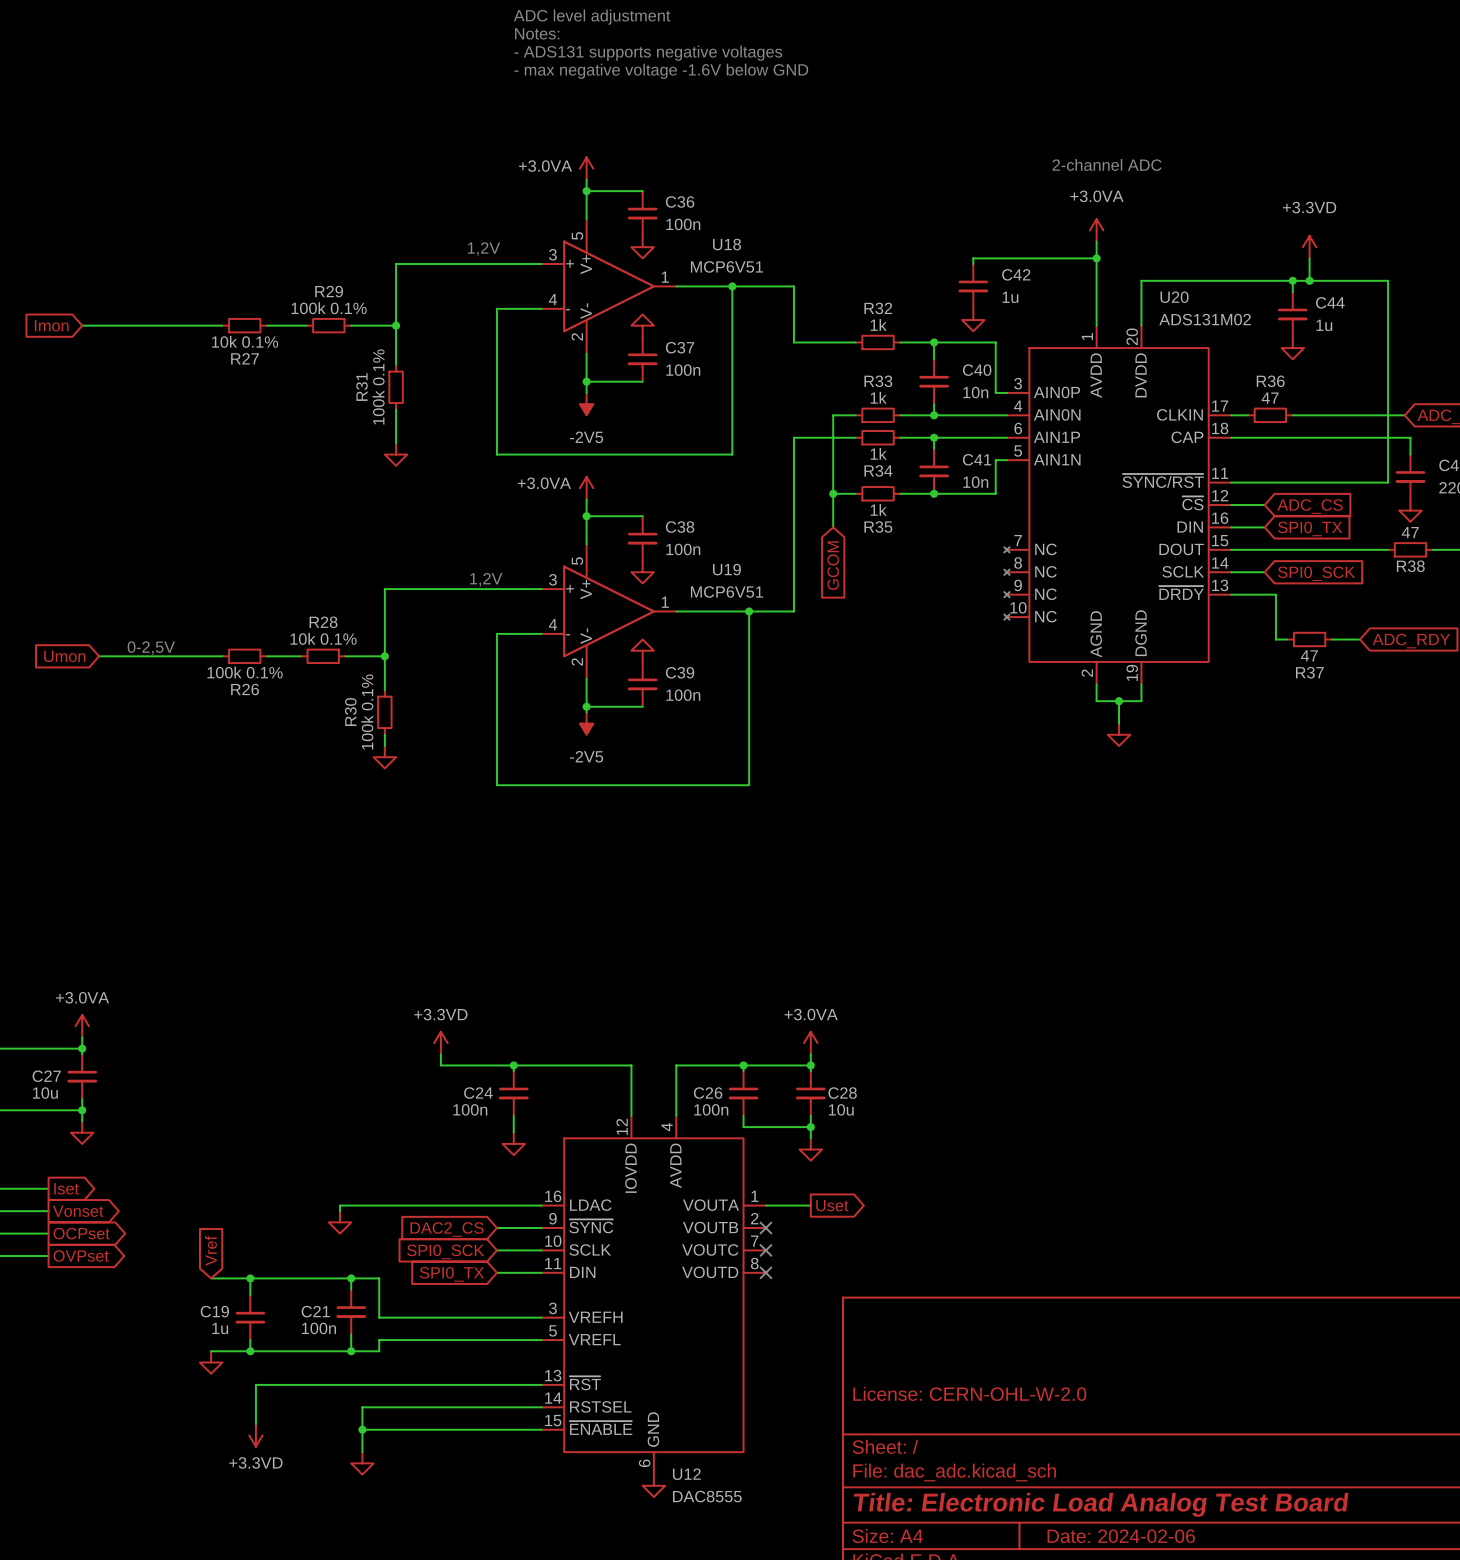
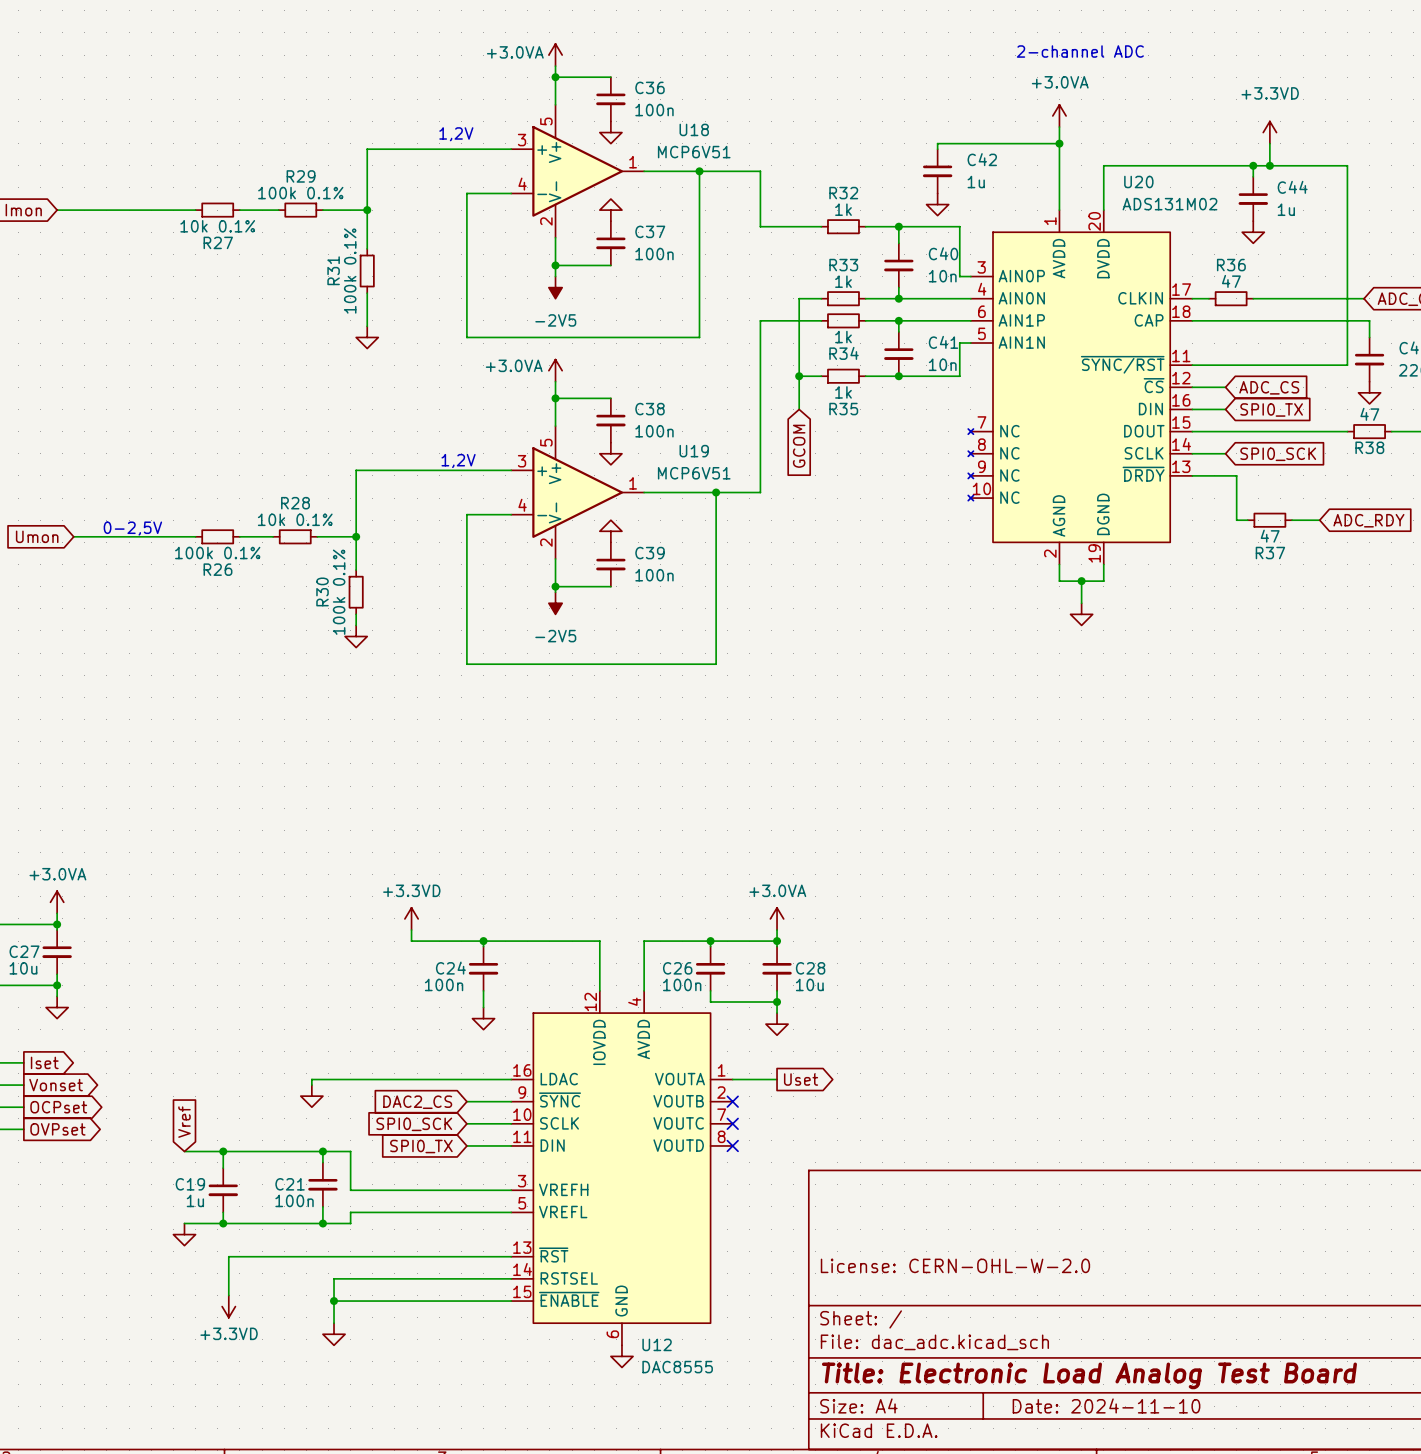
title block: Date: 2024-02-06 (1121, 1536) -> Date: 2024-11-10 (1106, 1405)

